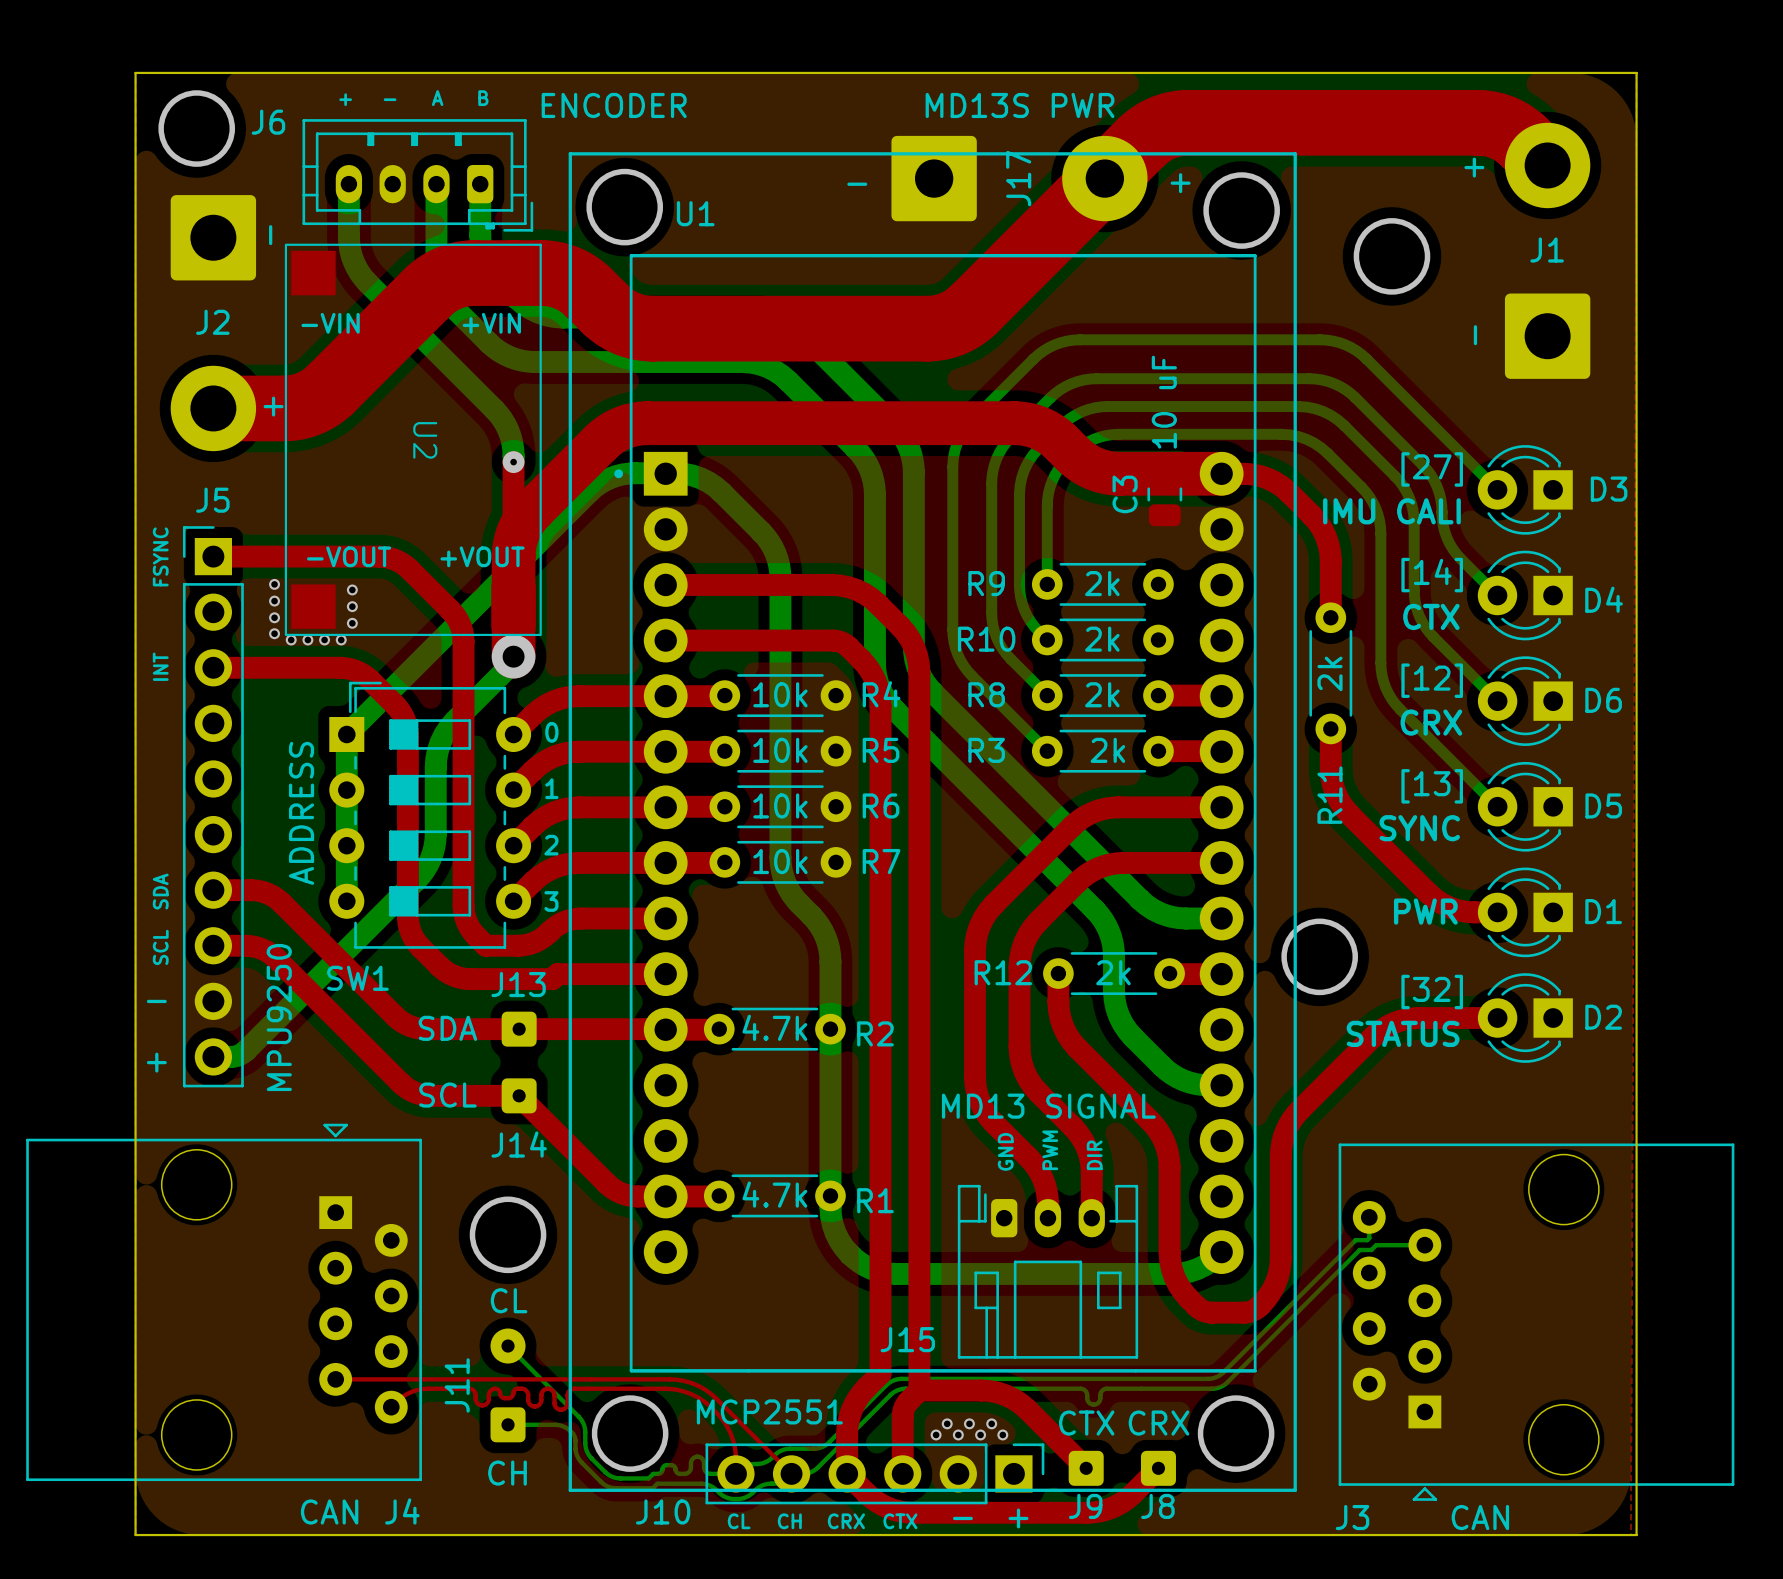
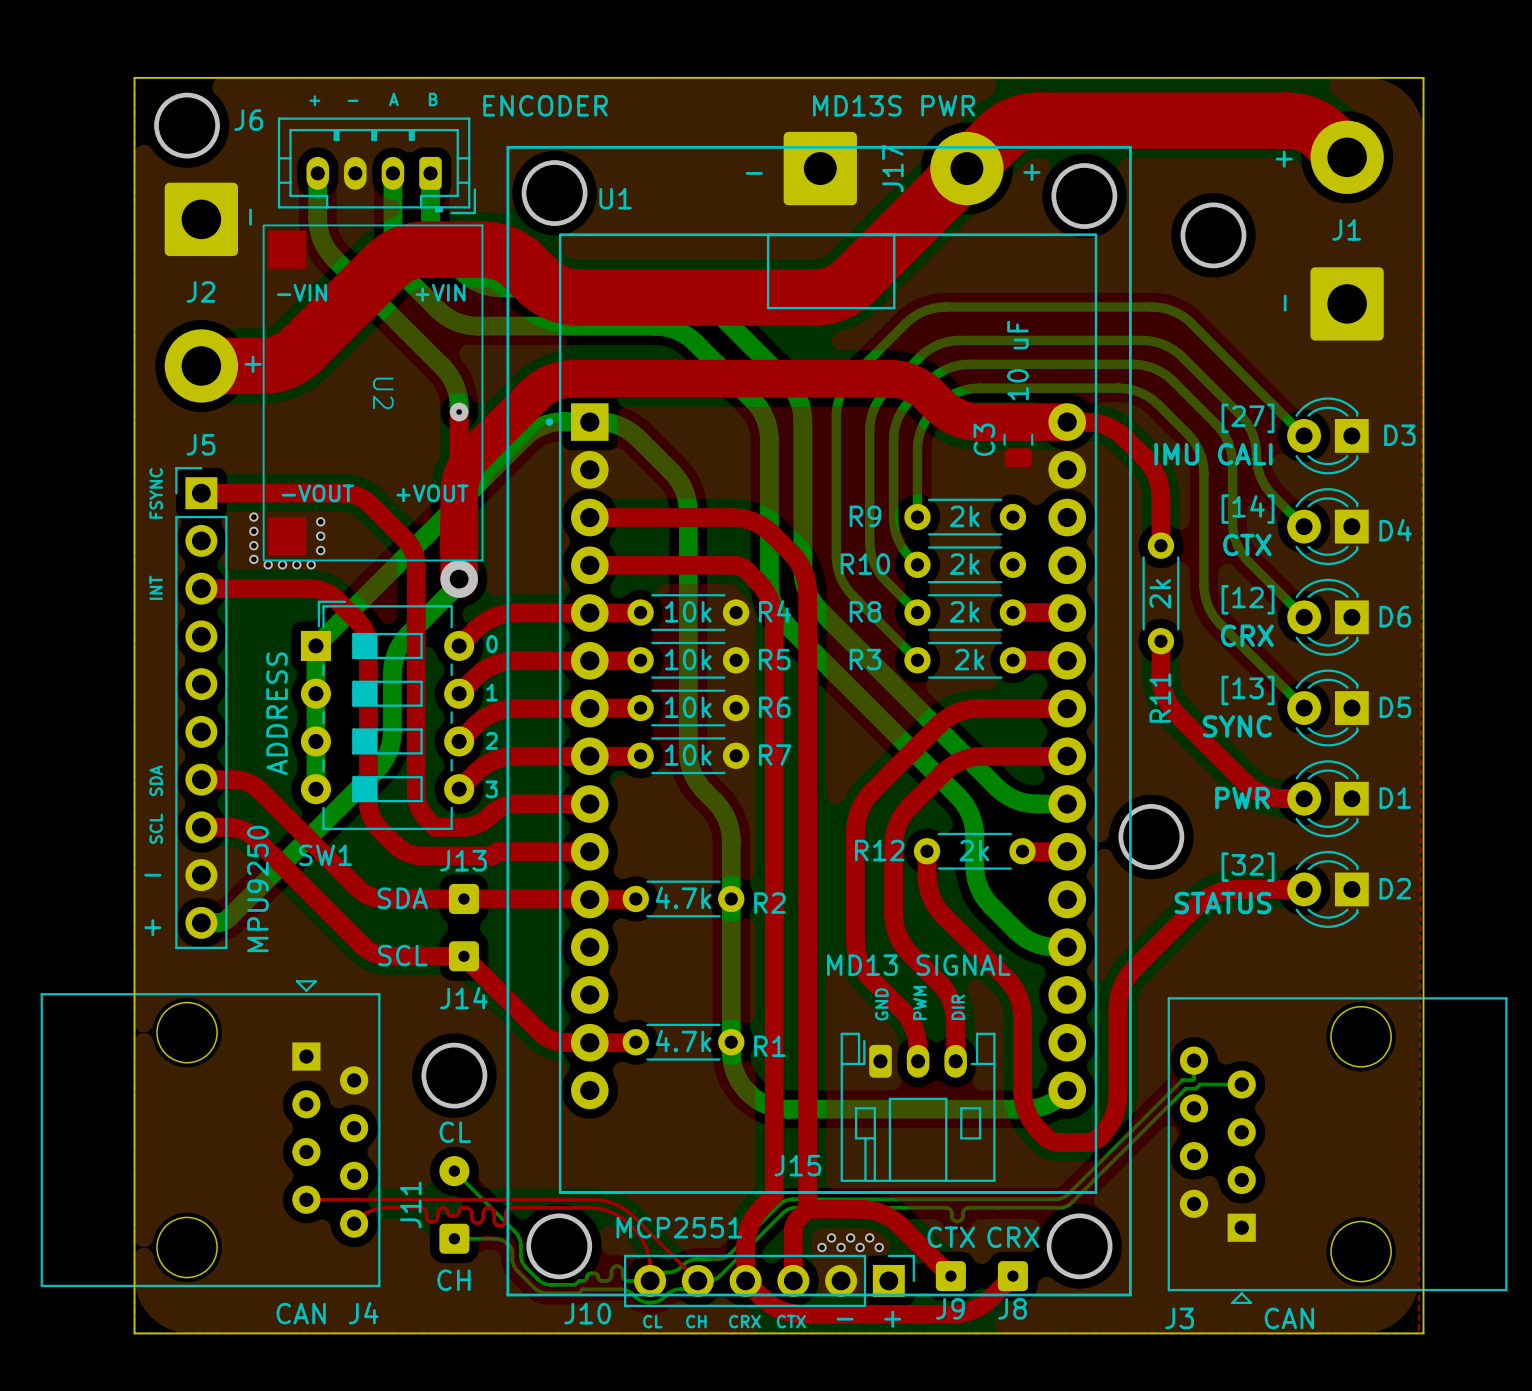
U1 footprint: [614, 254, 1257, 1373] -> [545, 233, 1098, 1194]

